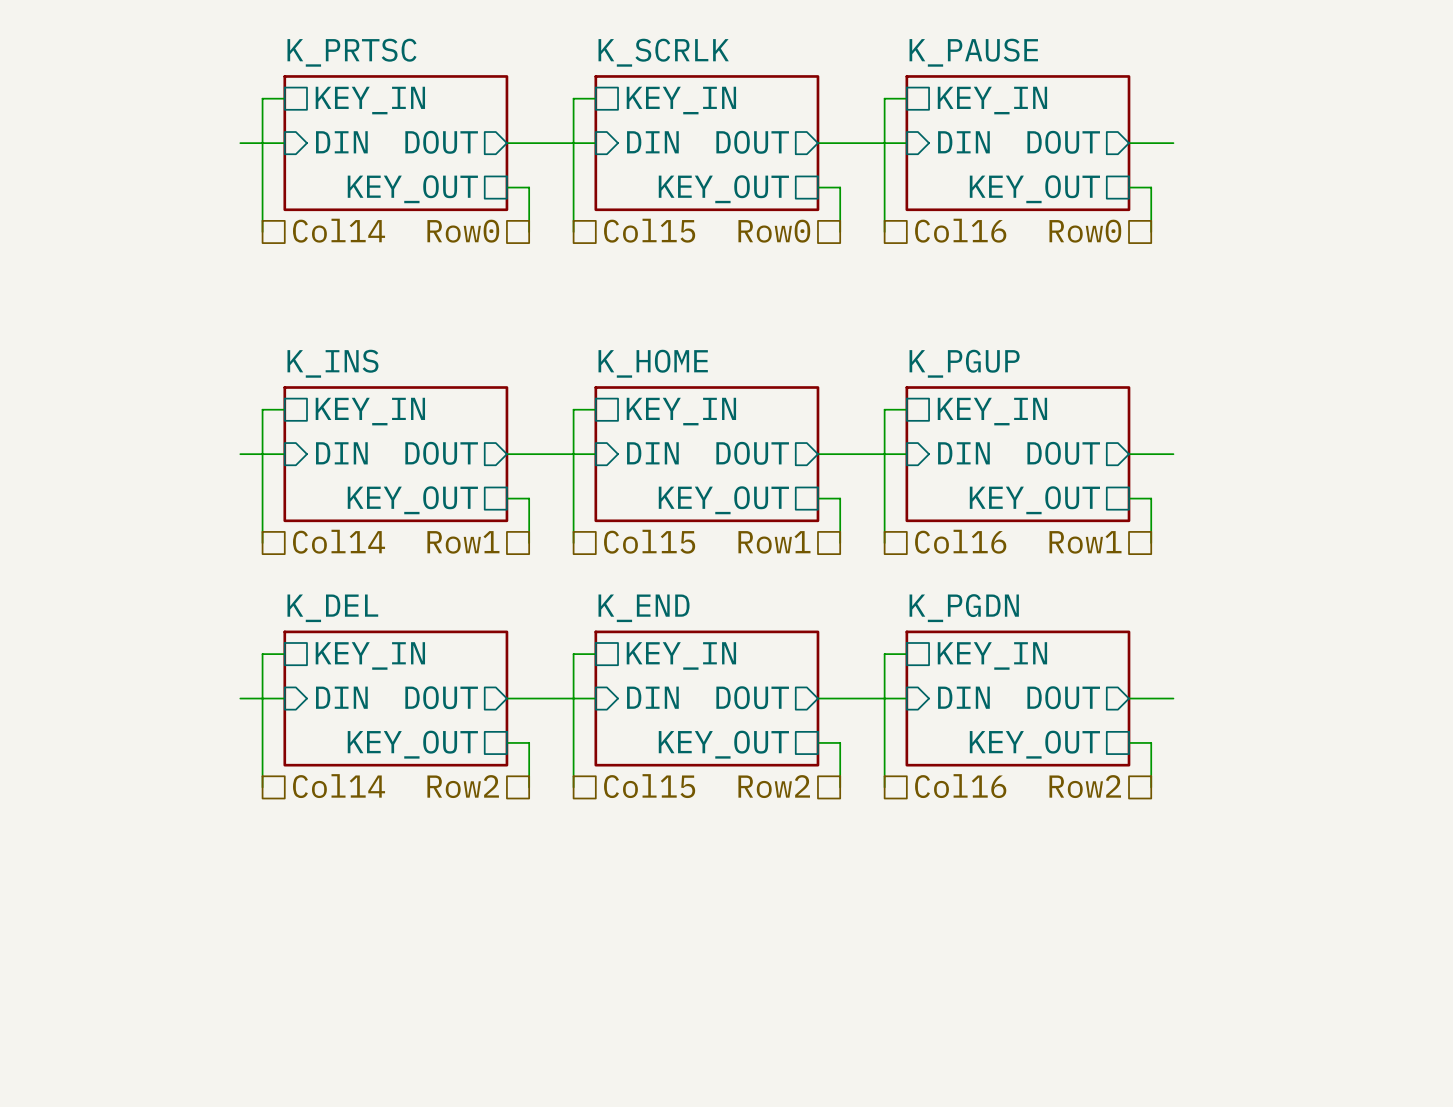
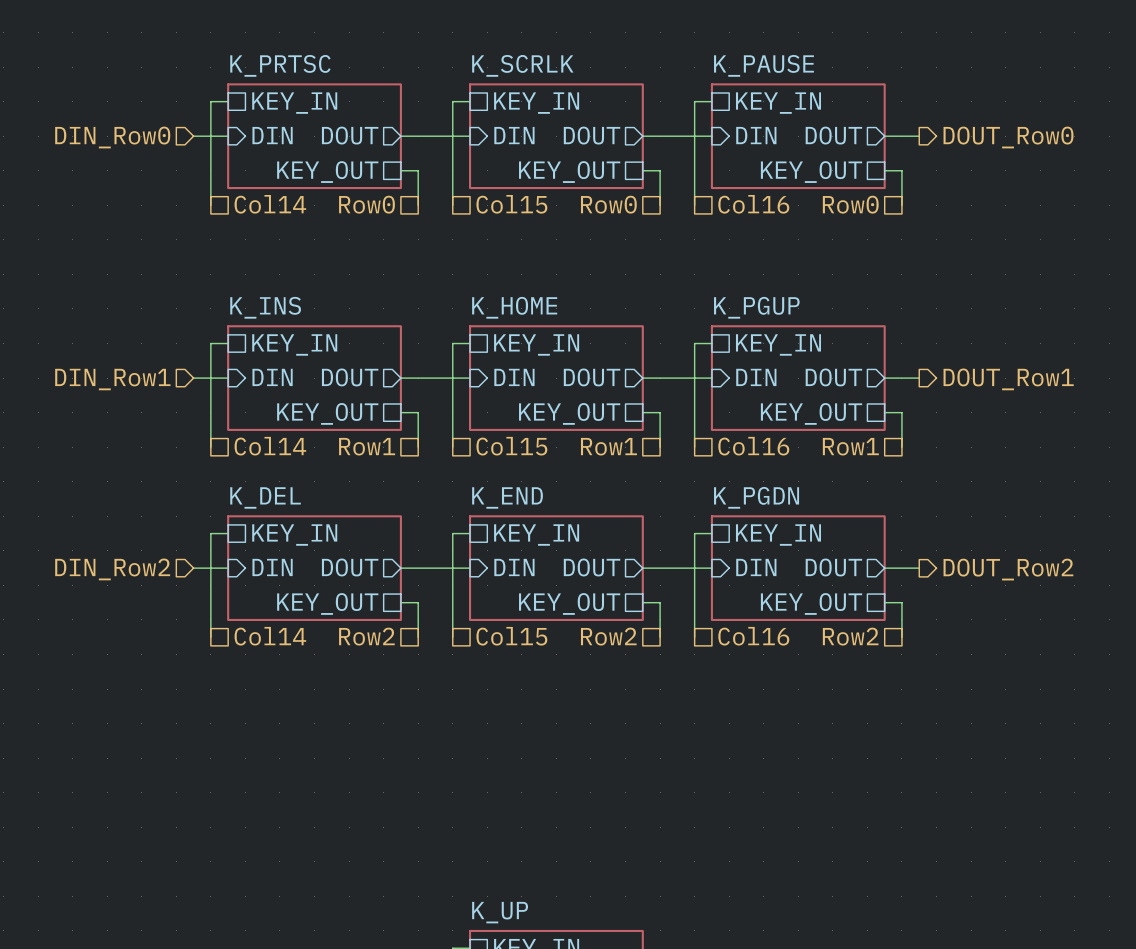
hierarchical label: none -> DIN_Row0 (112, 137)
hierarchical label: none -> DOUT_Row0 (1008, 137)
hierarchical label: none -> DOUT_Row1 (1008, 379)
hierarchical label: none -> DIN_Row1 (112, 379)
hierarchical label: none -> DIN_Row2 (112, 569)
hierarchical label: none -> DOUT_Row2 (1008, 569)

